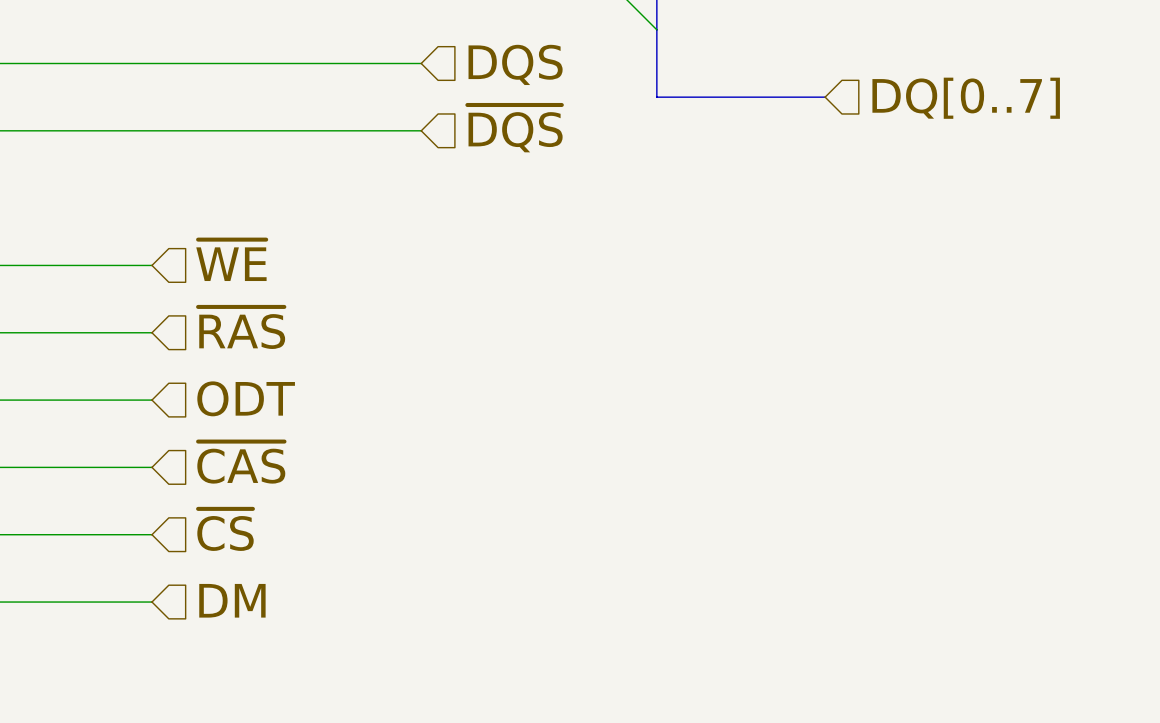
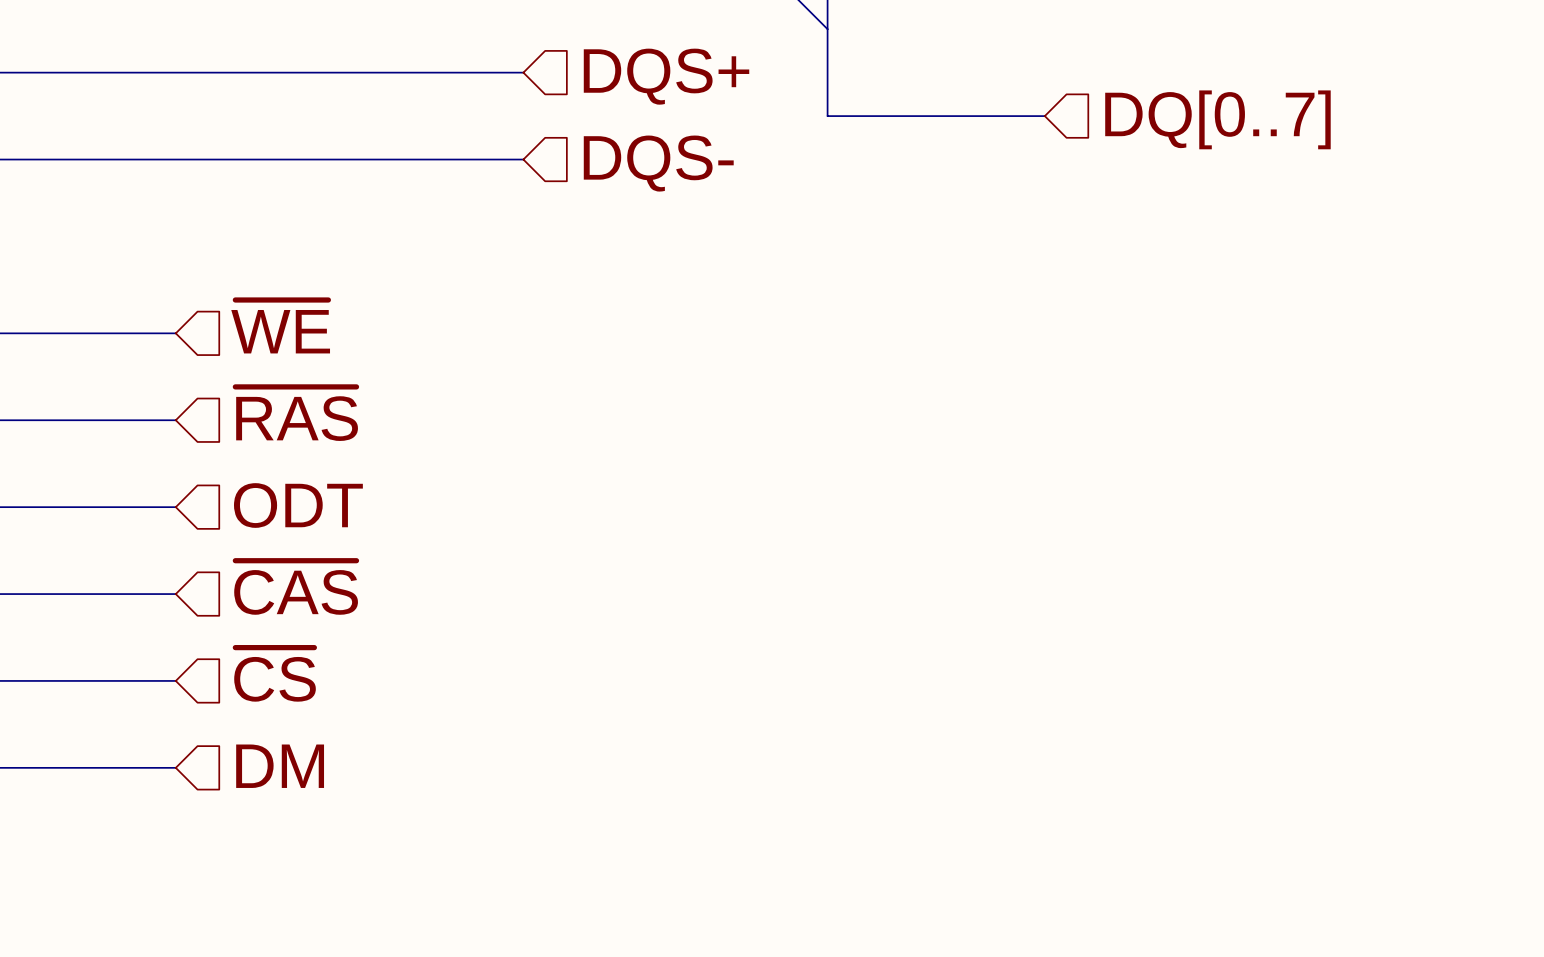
hierarchical label: DQS (515, 64) -> DQS+ (666, 76)
hierarchical label: ~{DQS} (514, 128) -> DQS- (658, 163)

